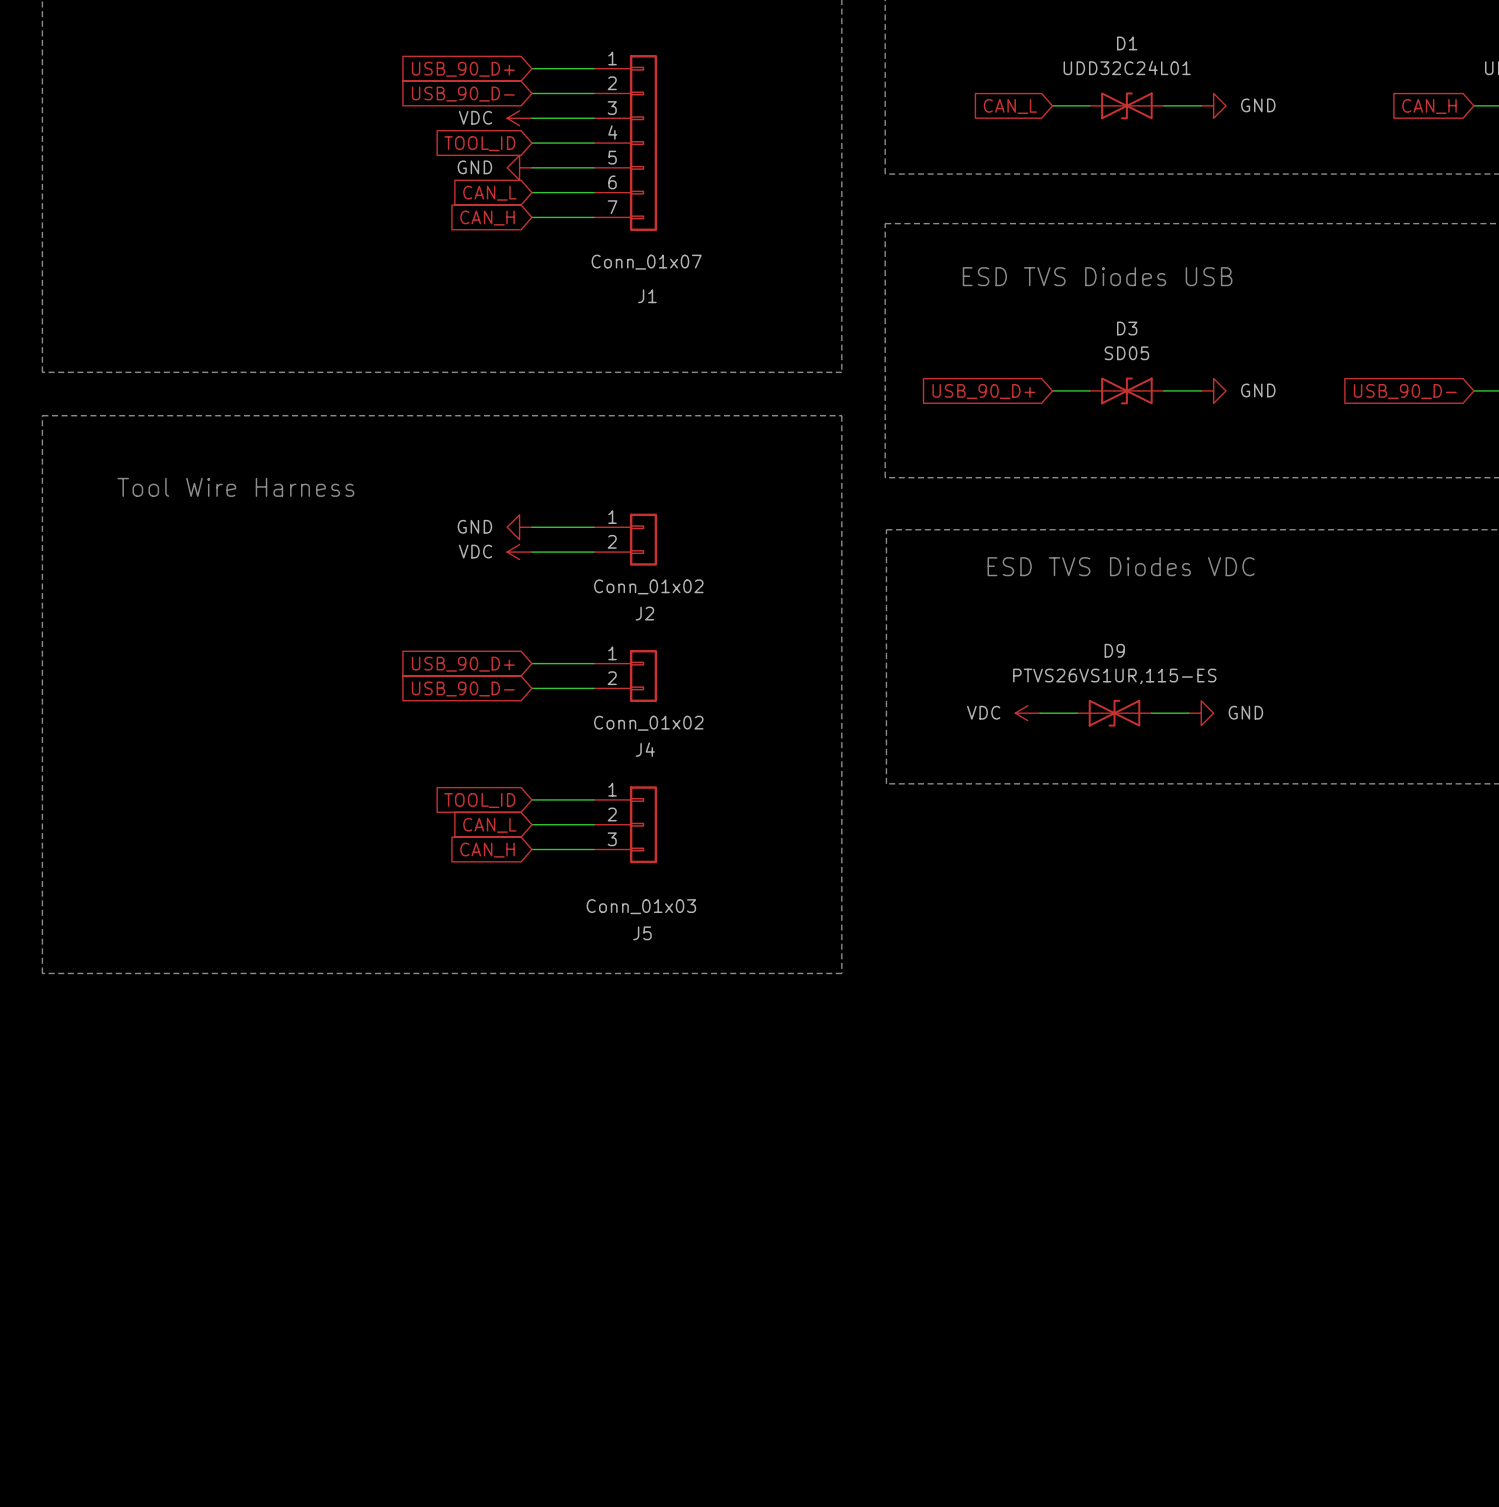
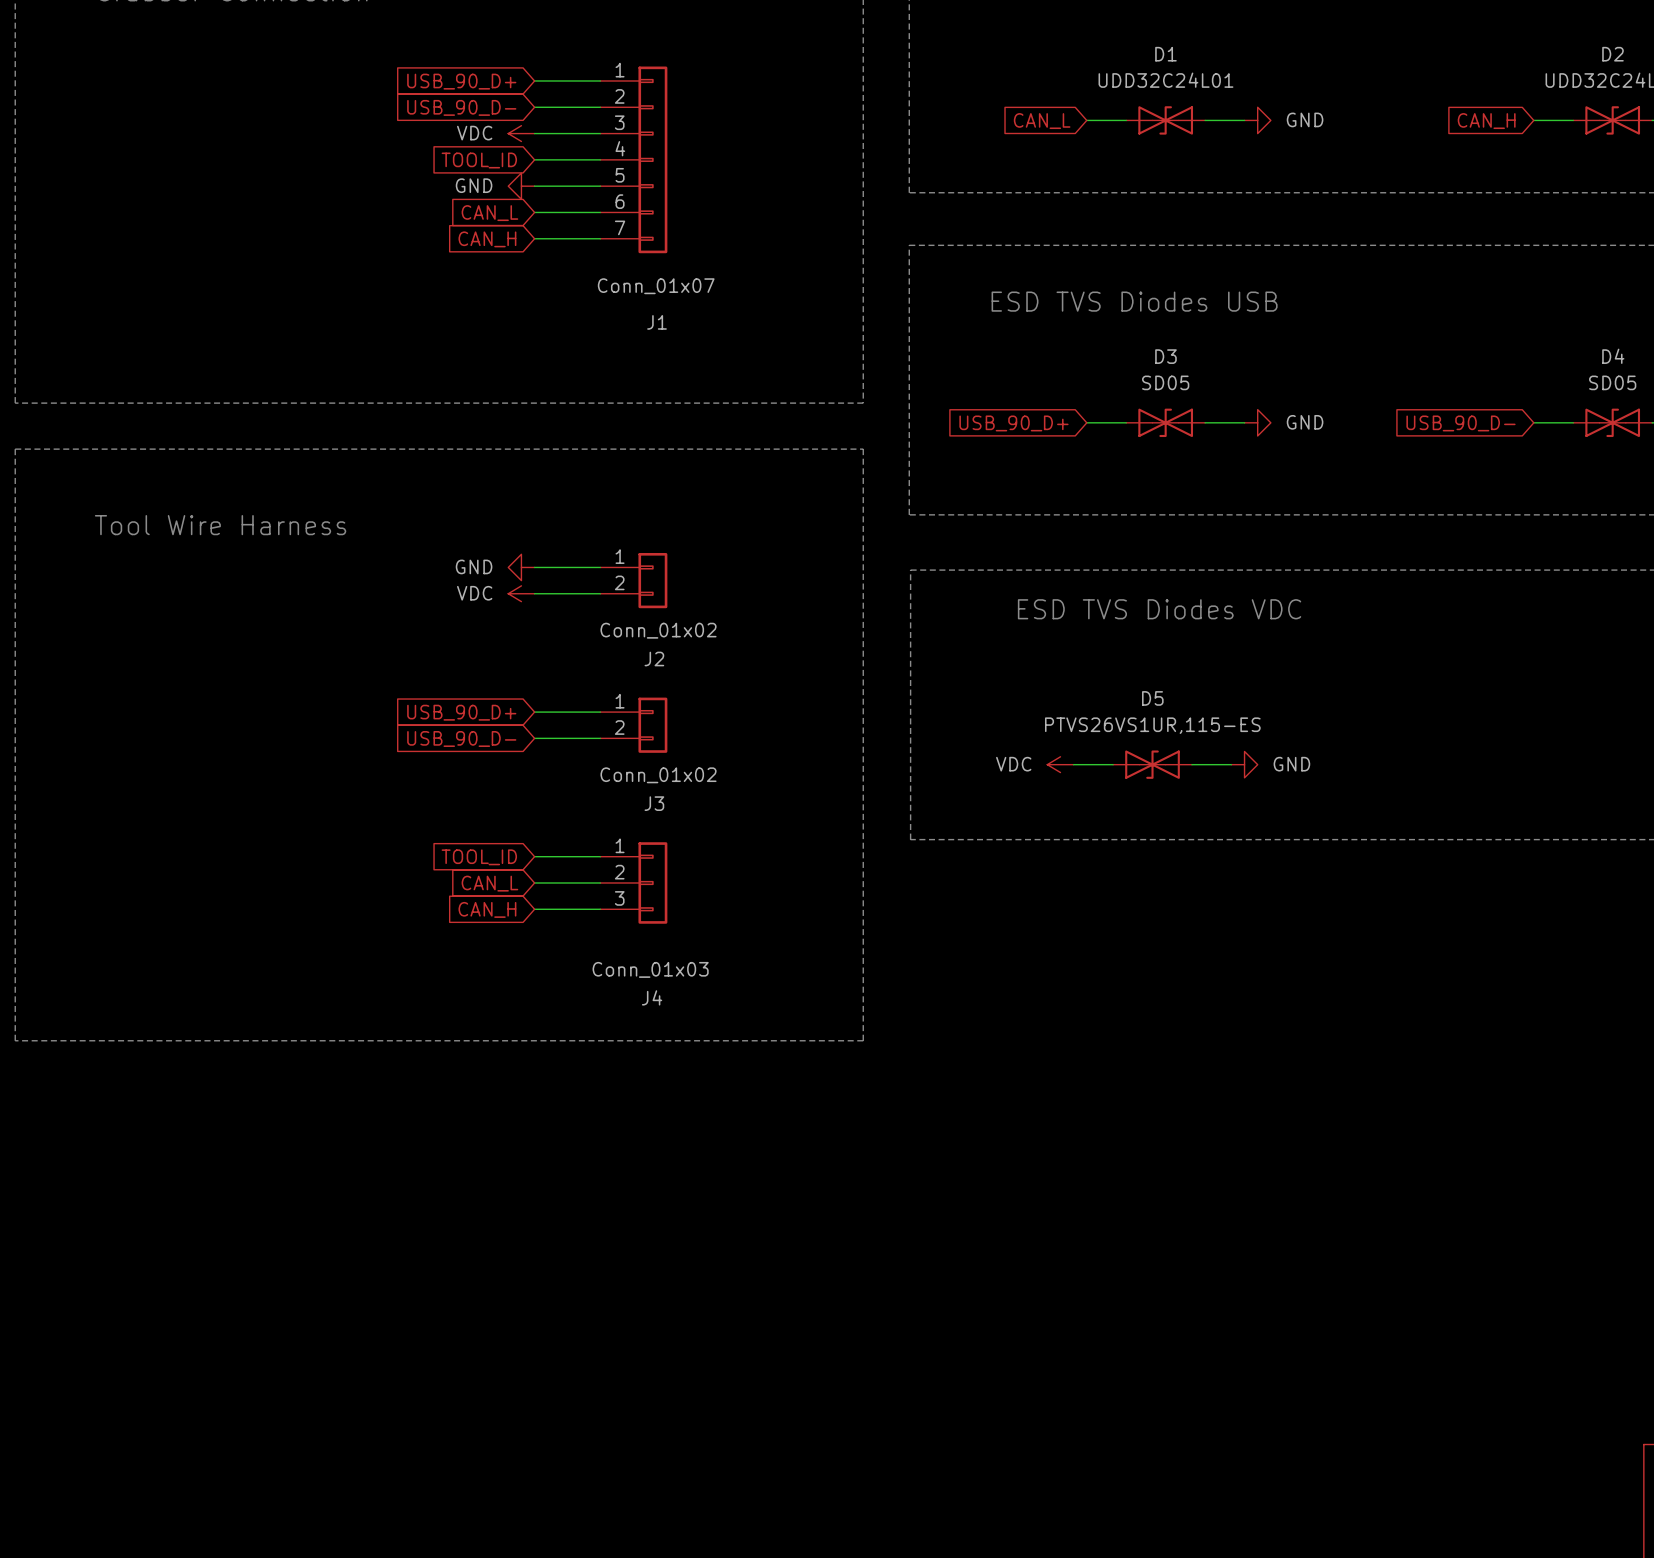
D9 name: D9 (1114, 650) -> D5 (1152, 698)
J4 name: J4 (645, 749) -> J3 (654, 803)
J5 name: J5 (642, 933) -> J4 (652, 997)

